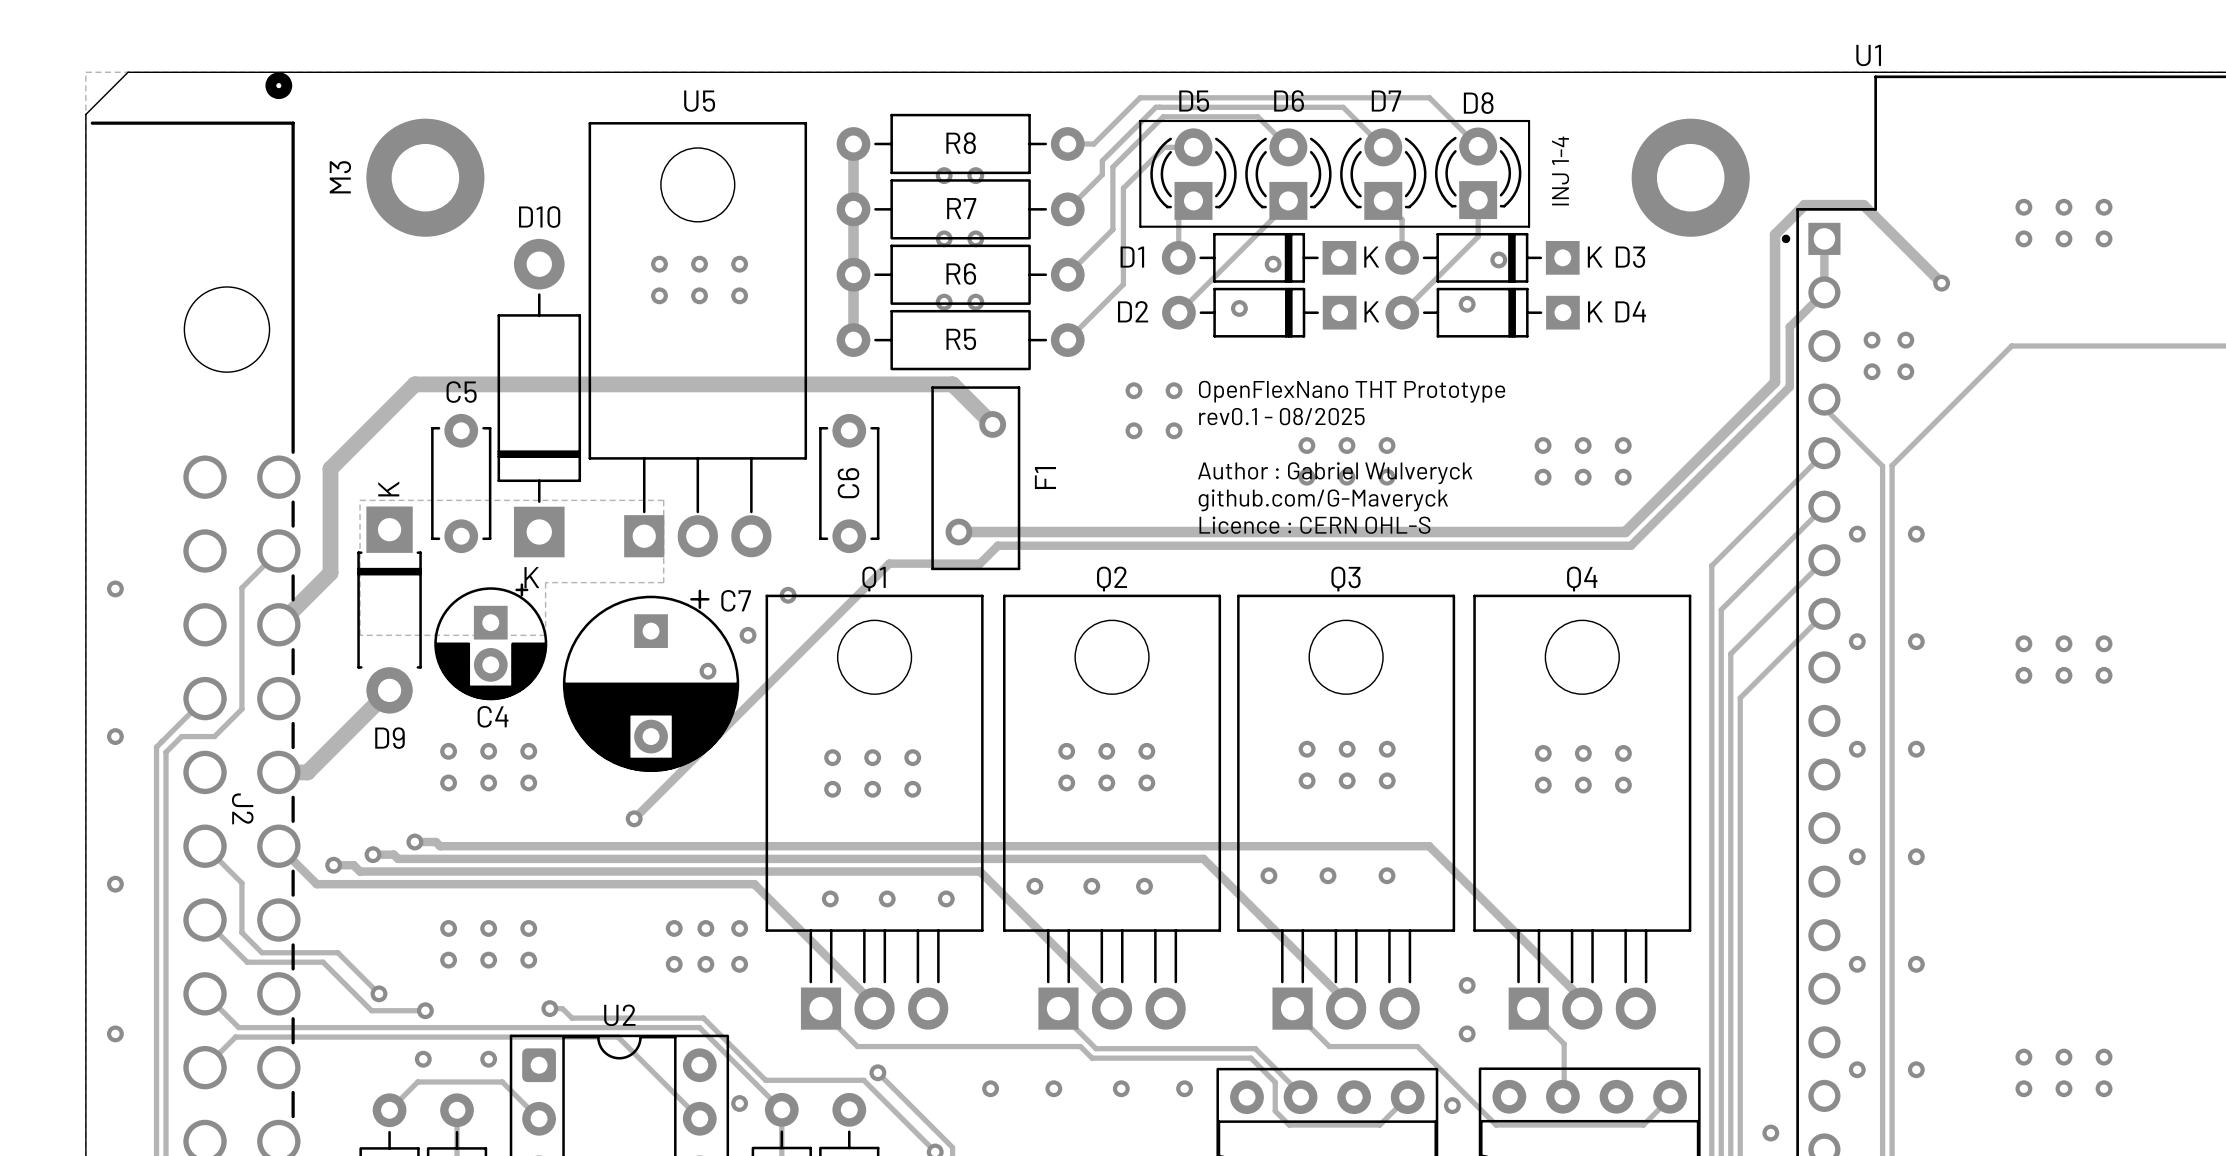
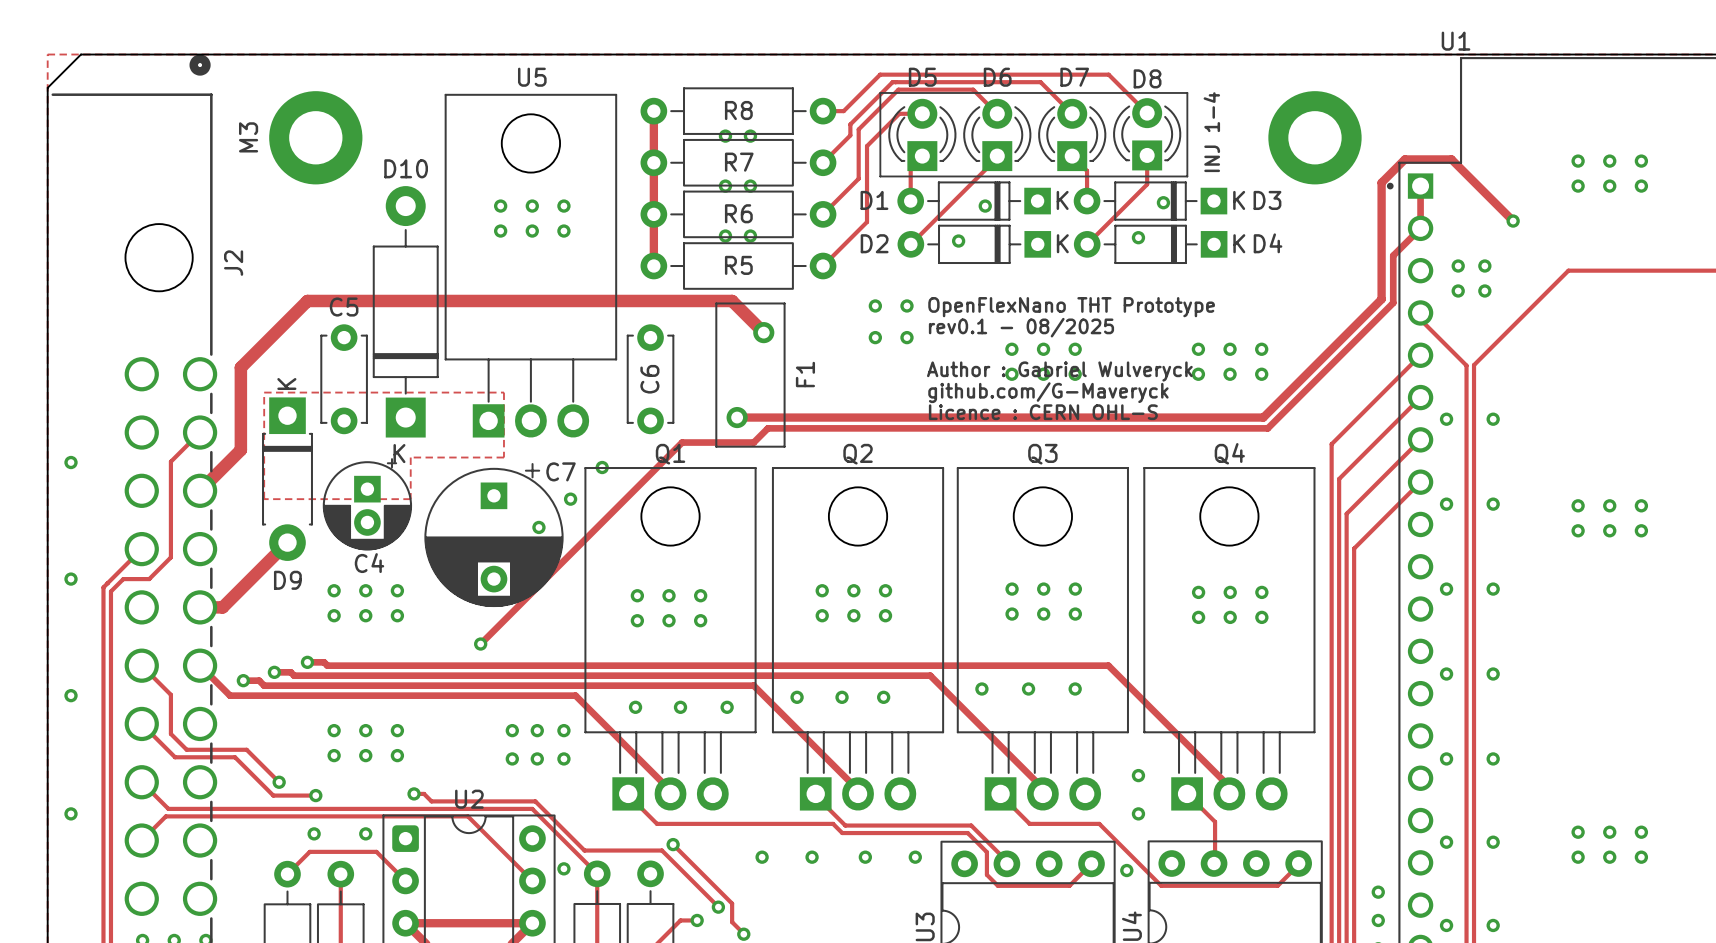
J2 name rotation: 0° (242, 808) -> 180° (233, 263)
J2 name position: J2 (242, 808) -> J2 (233, 263)

